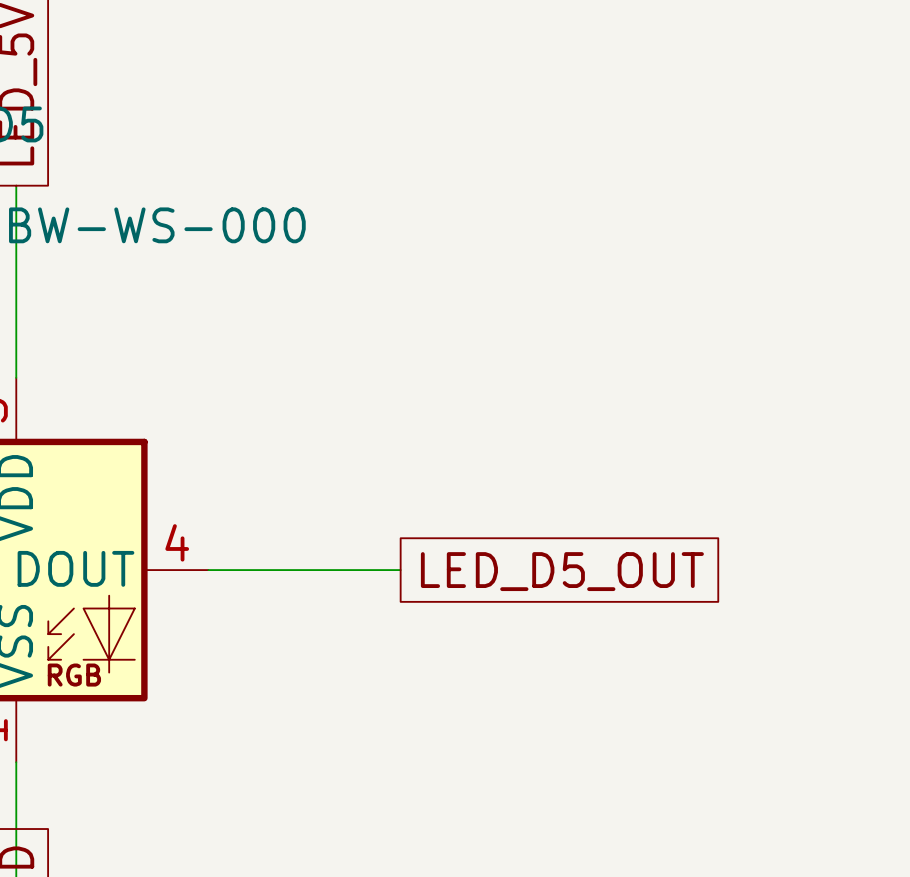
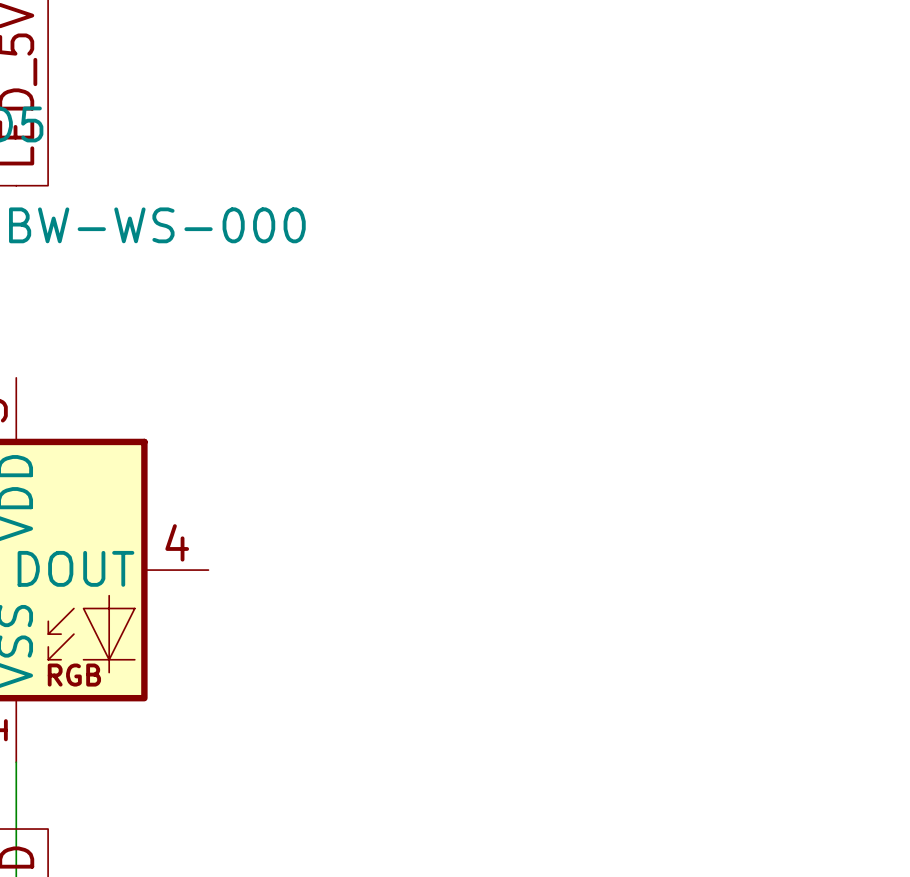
wire: (16, 185) (16, 377) -> none
wire: (208, 570) (400, 570) -> none
global label: LED_D5_OUT (562, 571) -> none

